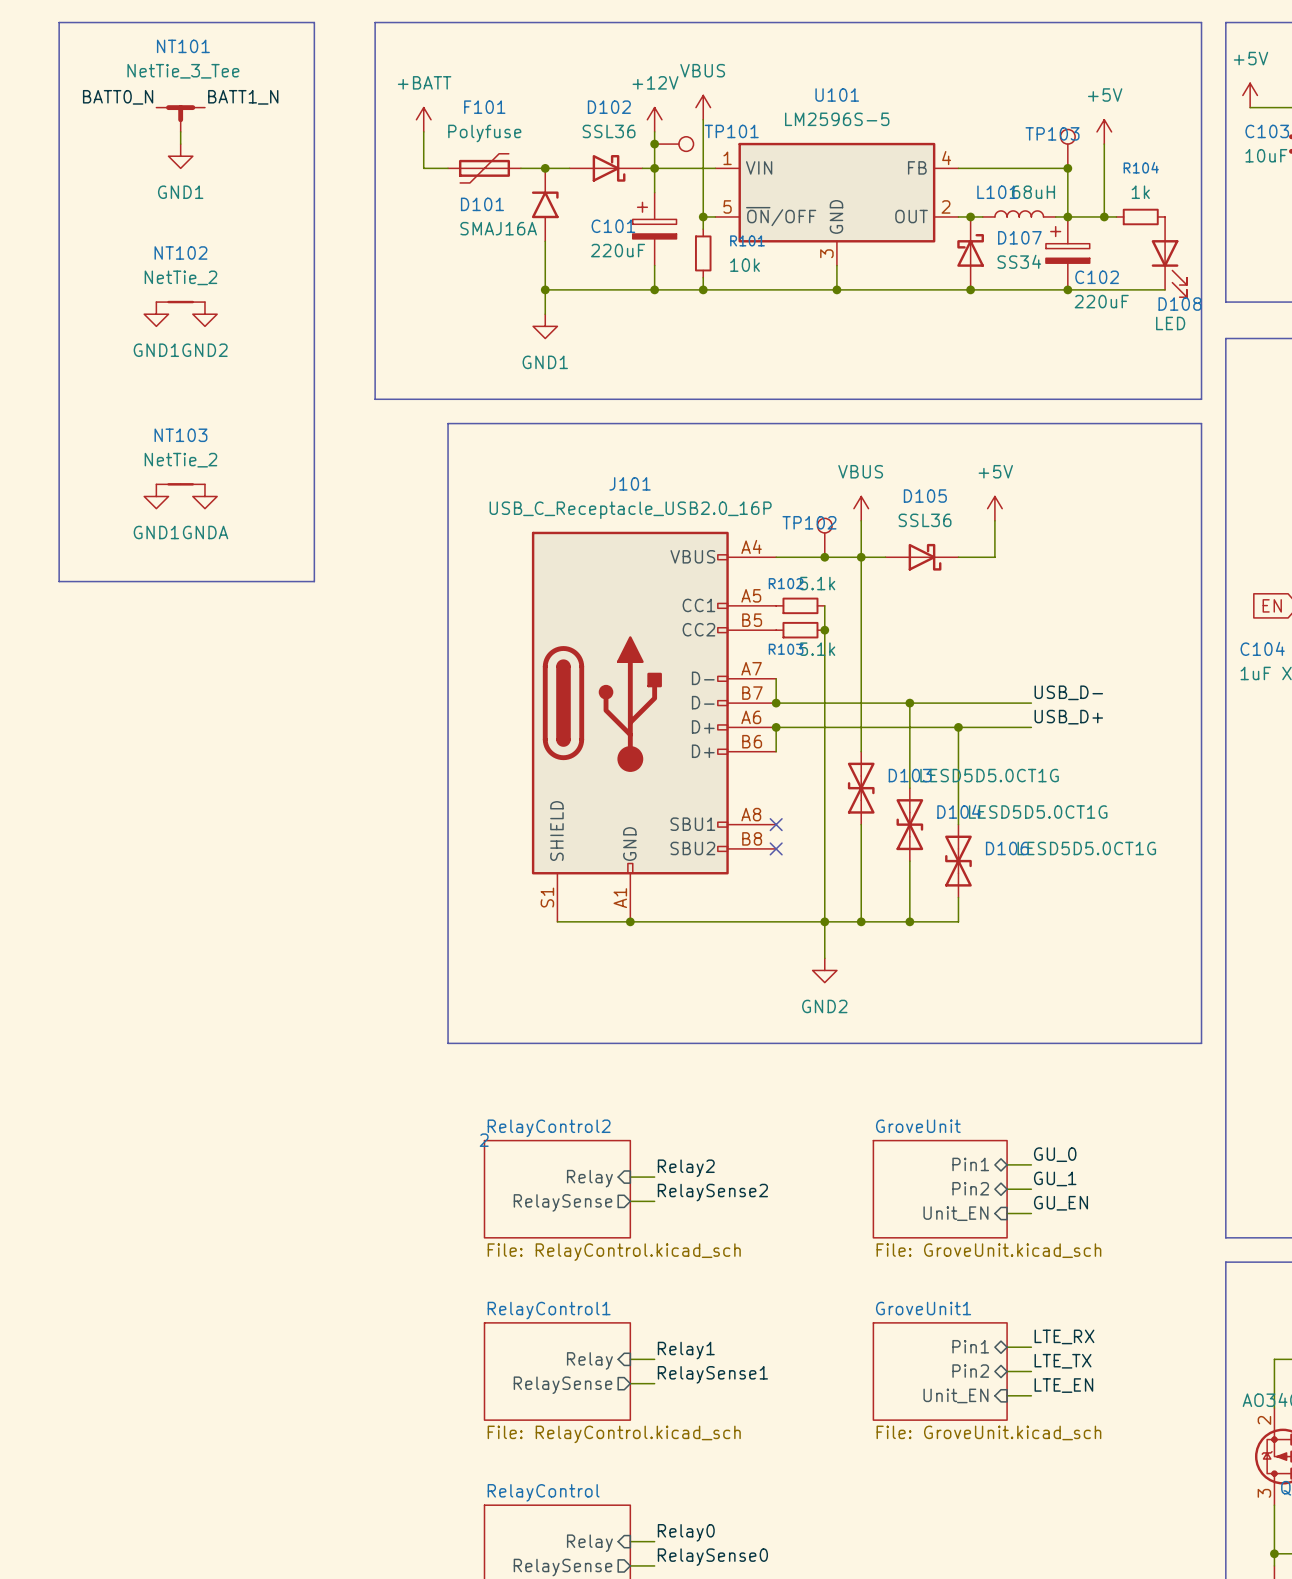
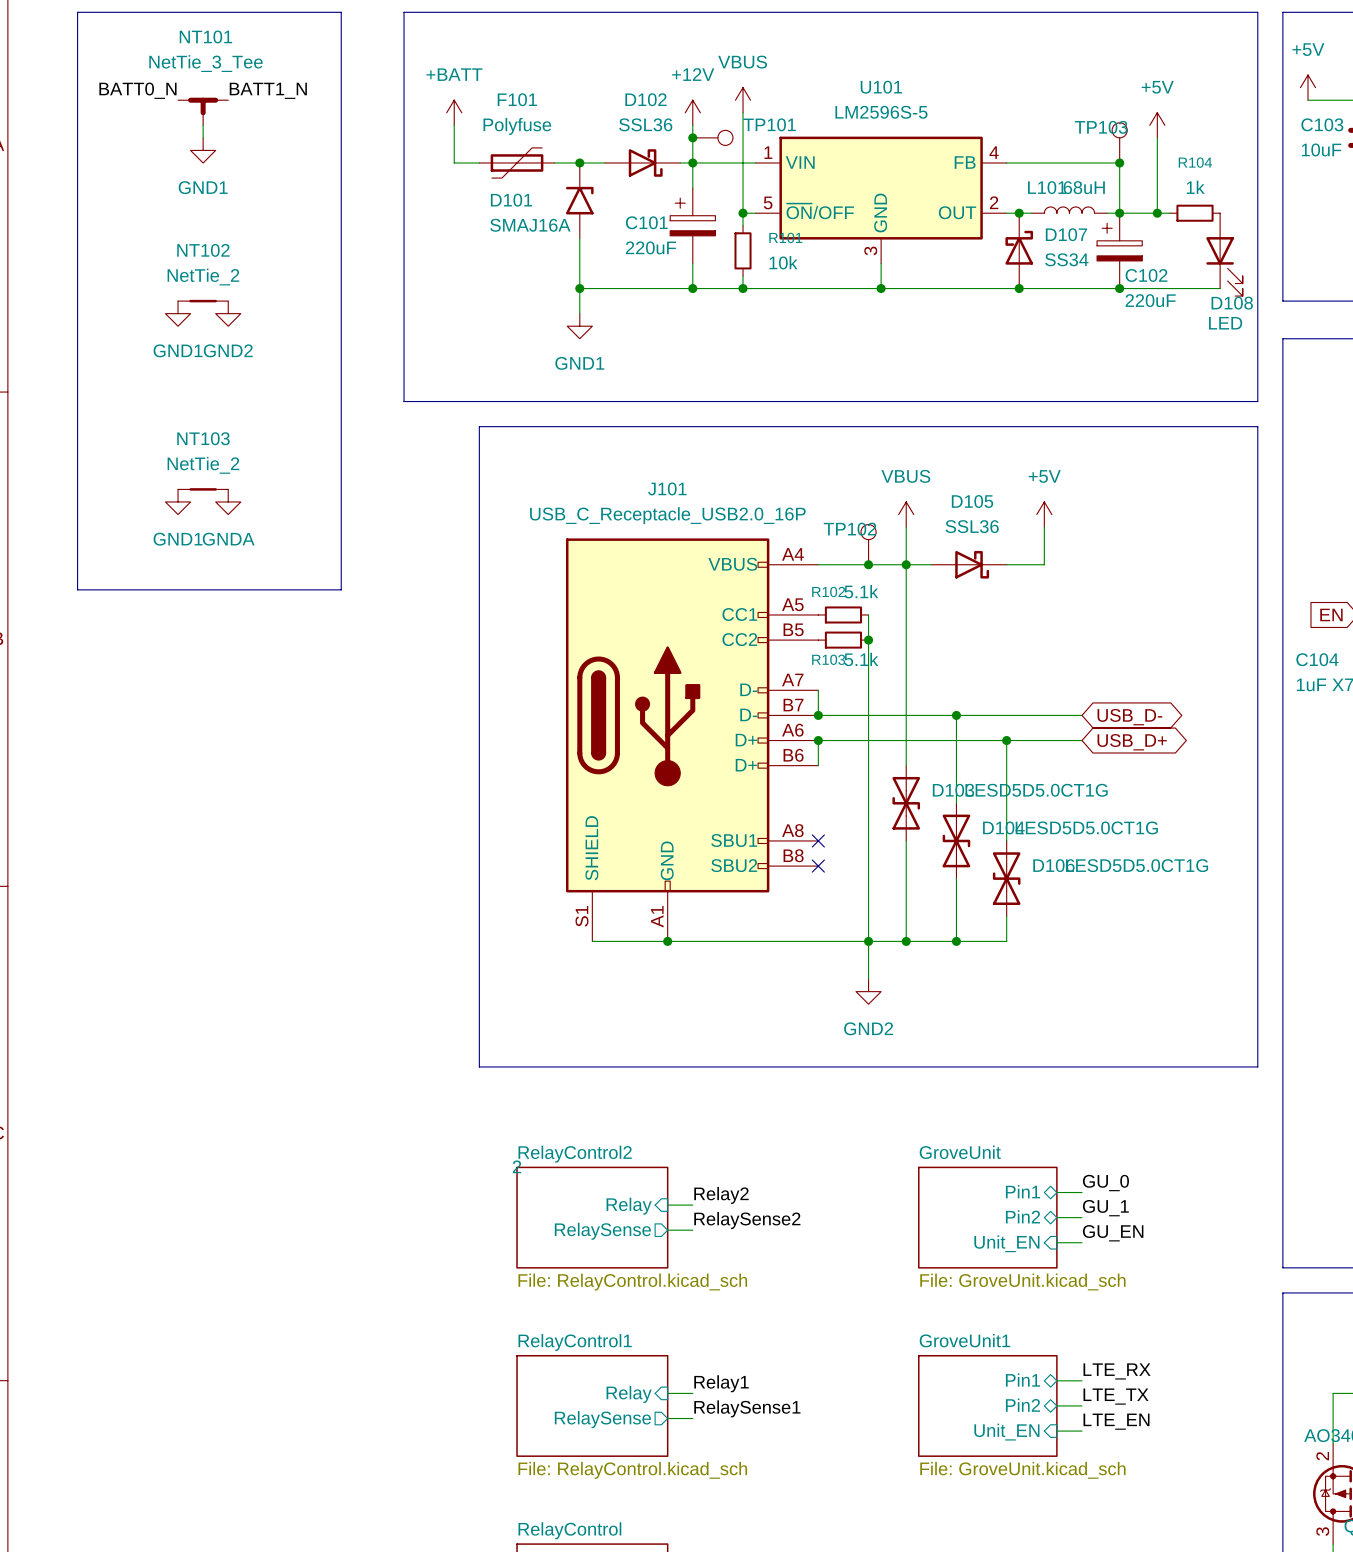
label: USB_D- (1068, 692) -> none
global label: none -> USB_D- (1129, 717)
label: USB_D+ (1068, 717) -> none
global label: none -> USB_D+ (1132, 742)

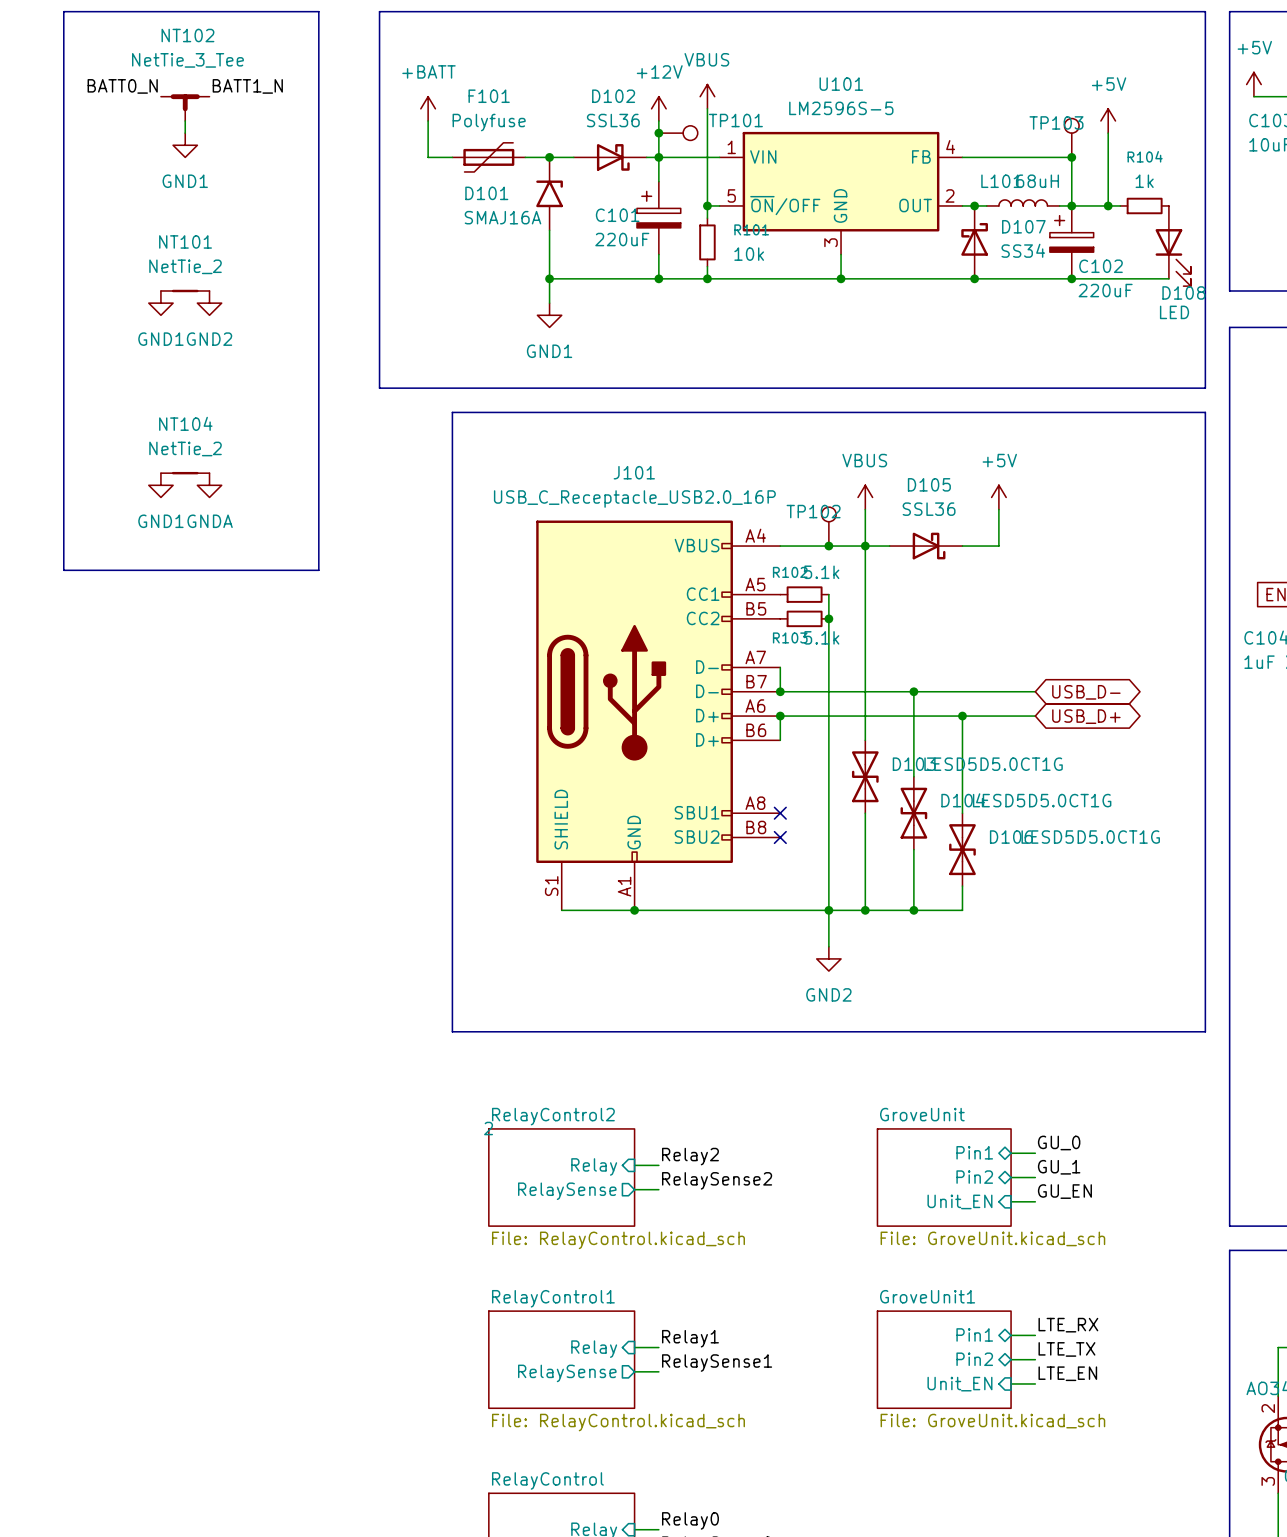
NT101 name: NT101 (205, 36) -> NT102 (187, 35)
NT102 name: NT102 (203, 250) -> NT101 (185, 241)
NT103 name: NT103 (203, 438) -> NT104 (185, 423)

